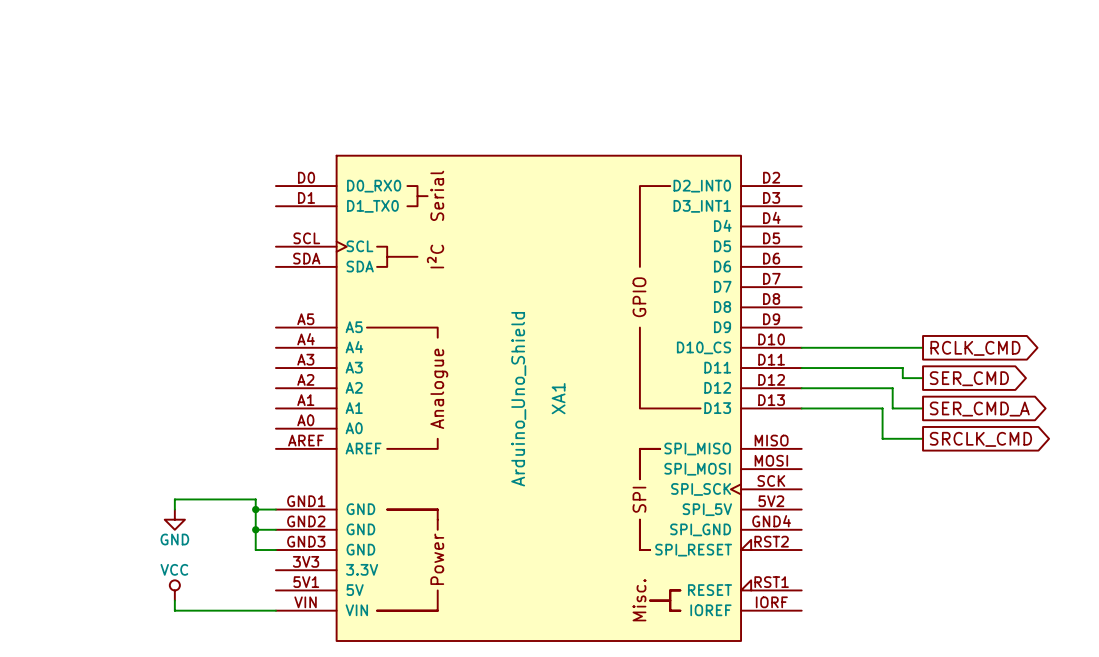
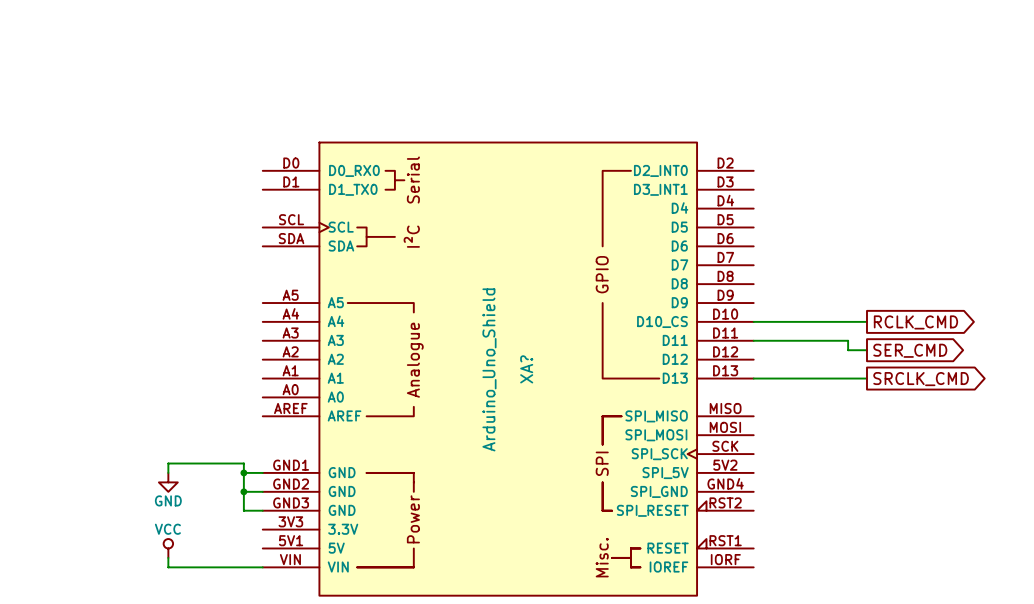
wire: (801, 388) (892, 388) (892, 408) -> none
XA1 name: XA1 (558, 398) -> XA? (526, 369)
wire: (882, 408) (882, 438) (923, 438) -> (829, 378) (838, 378)
global label: SER_CMD_A (979, 409) -> SRCLK_CMD (921, 379)
global label: SRCLK_CMD (980, 439) -> none

